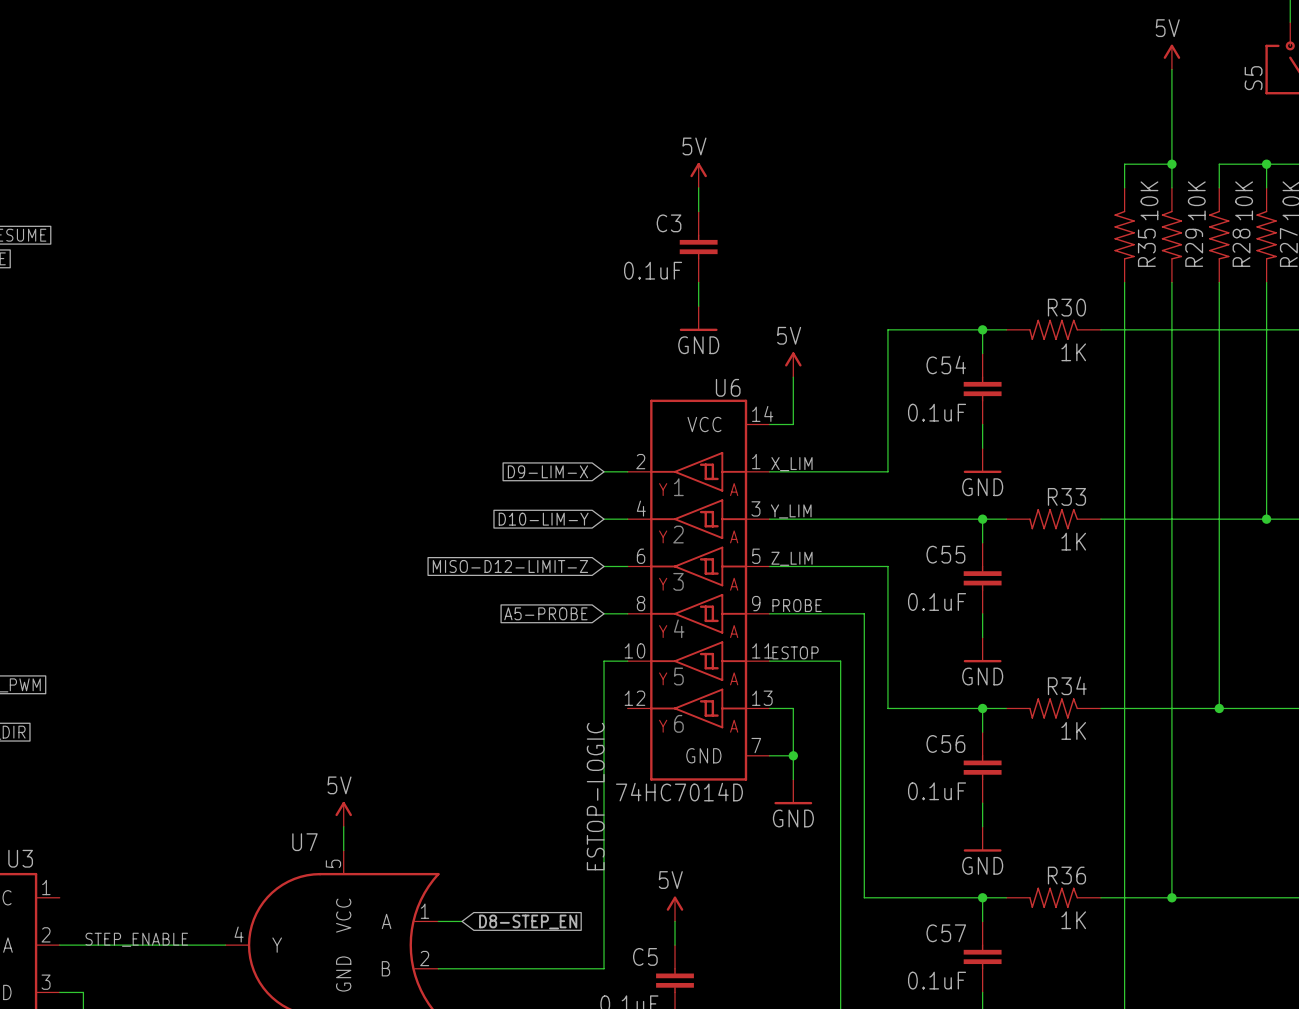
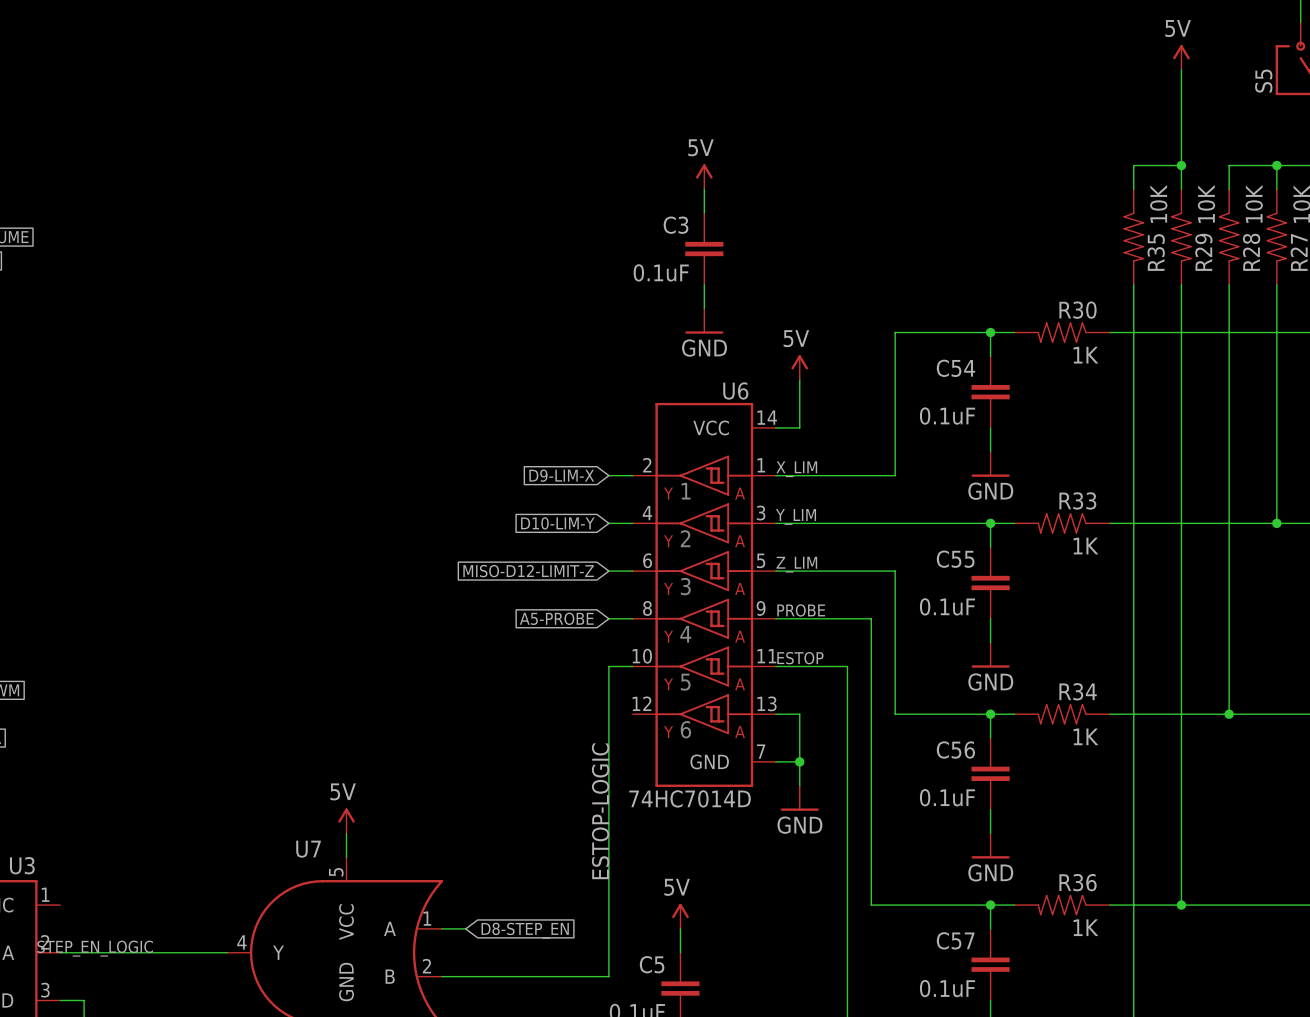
label: STEP_ENABLE (136, 939) -> STEP_EN_LOGIC (95, 948)

